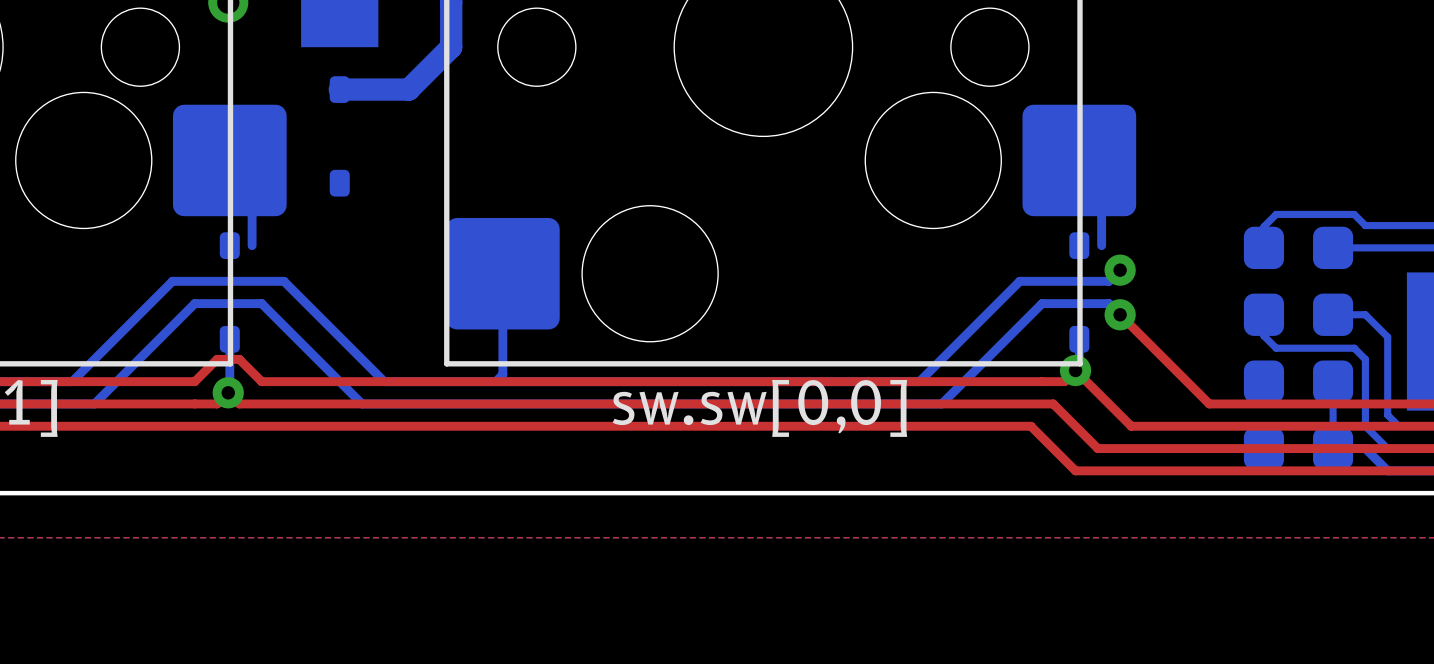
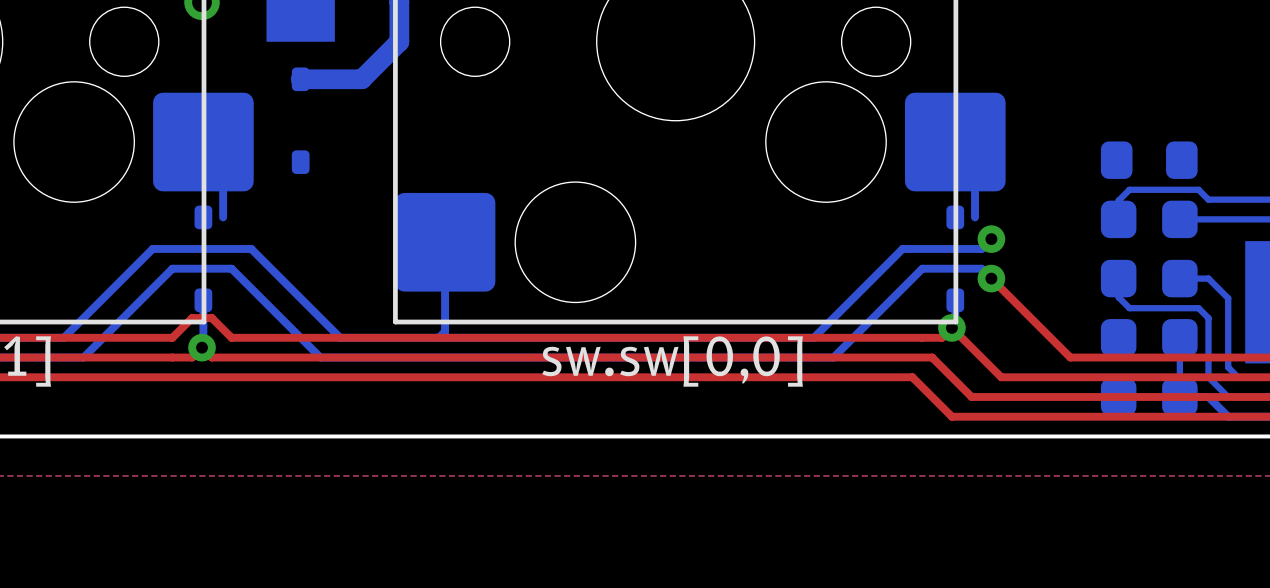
part: none -> (1149, 160)

